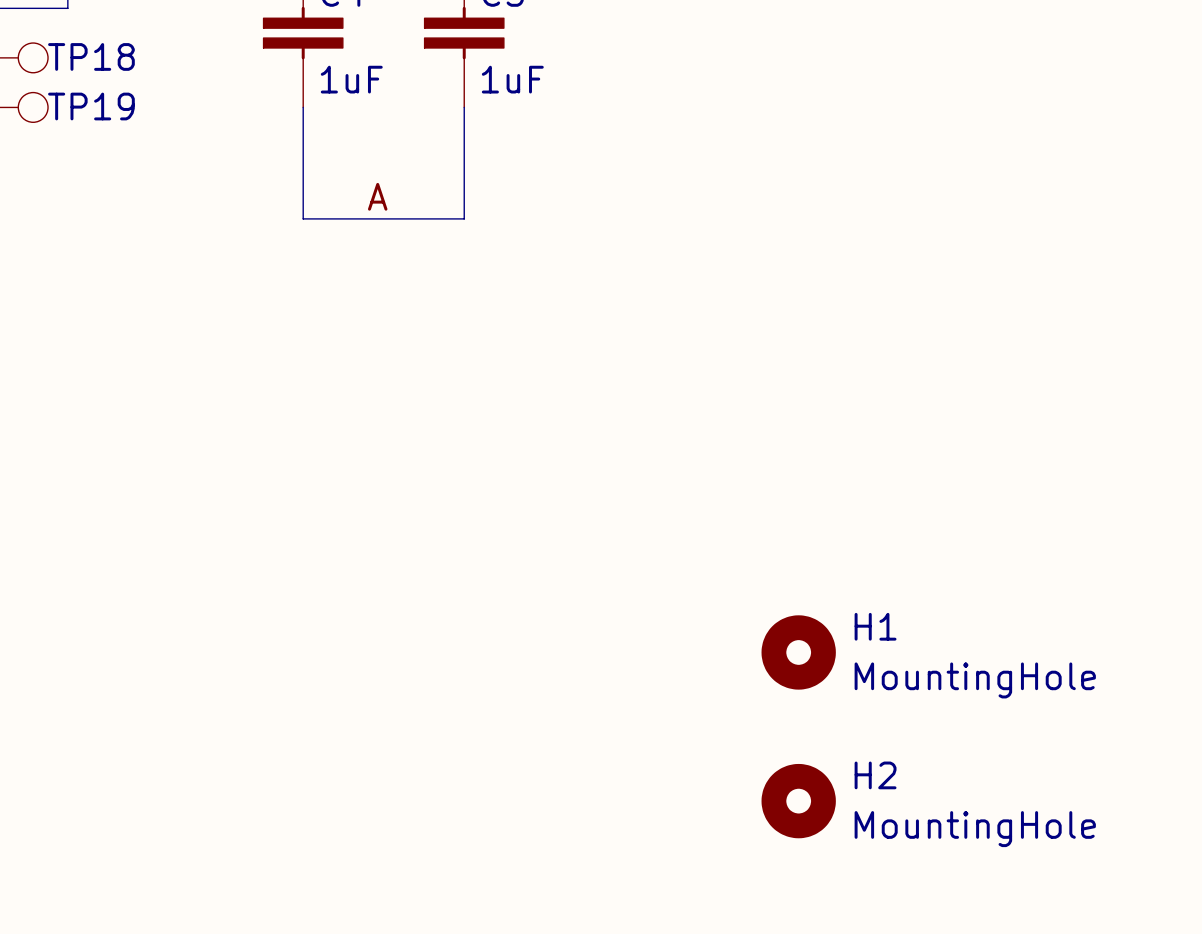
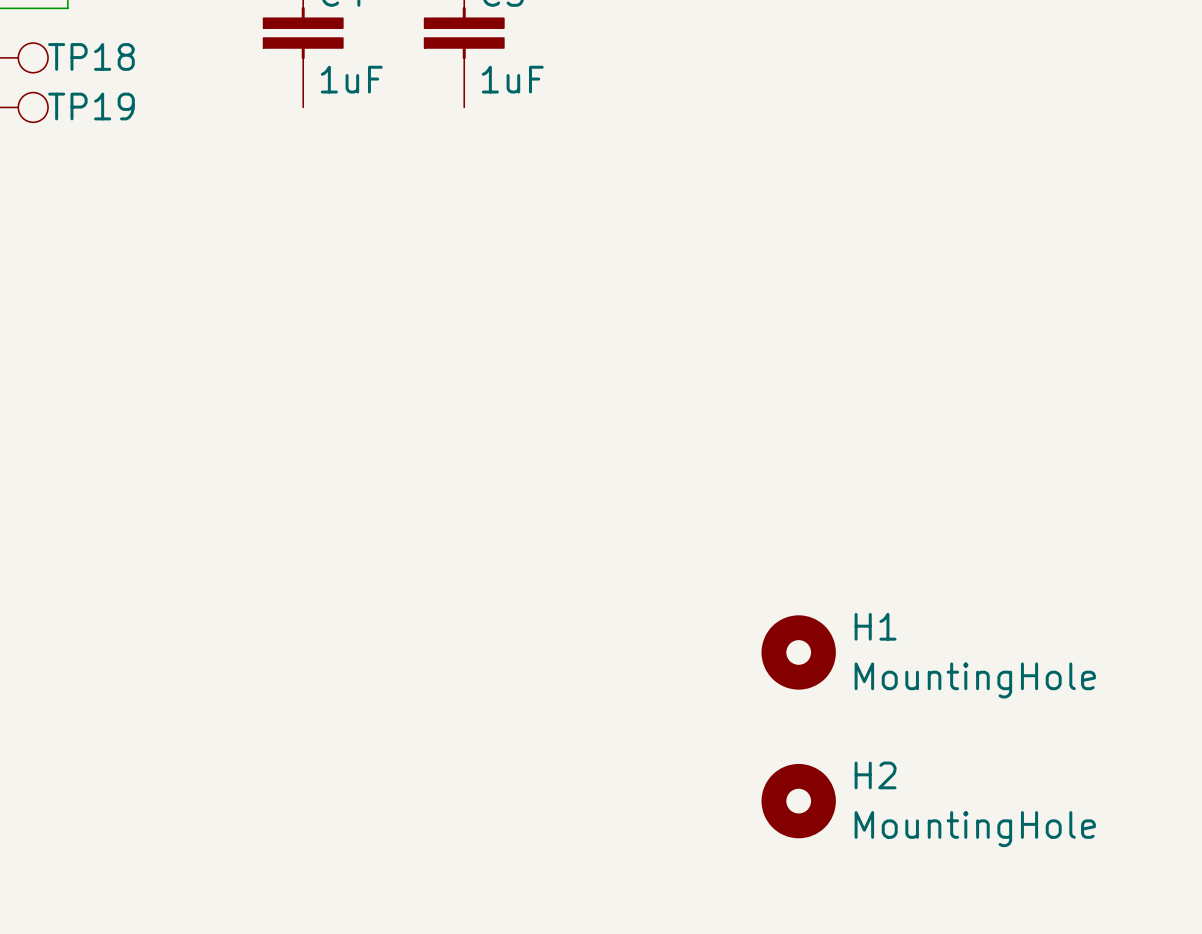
wire: (303, 107) (303, 218) (464, 218) (464, 107) -> none
label: A (377, 196) -> none

